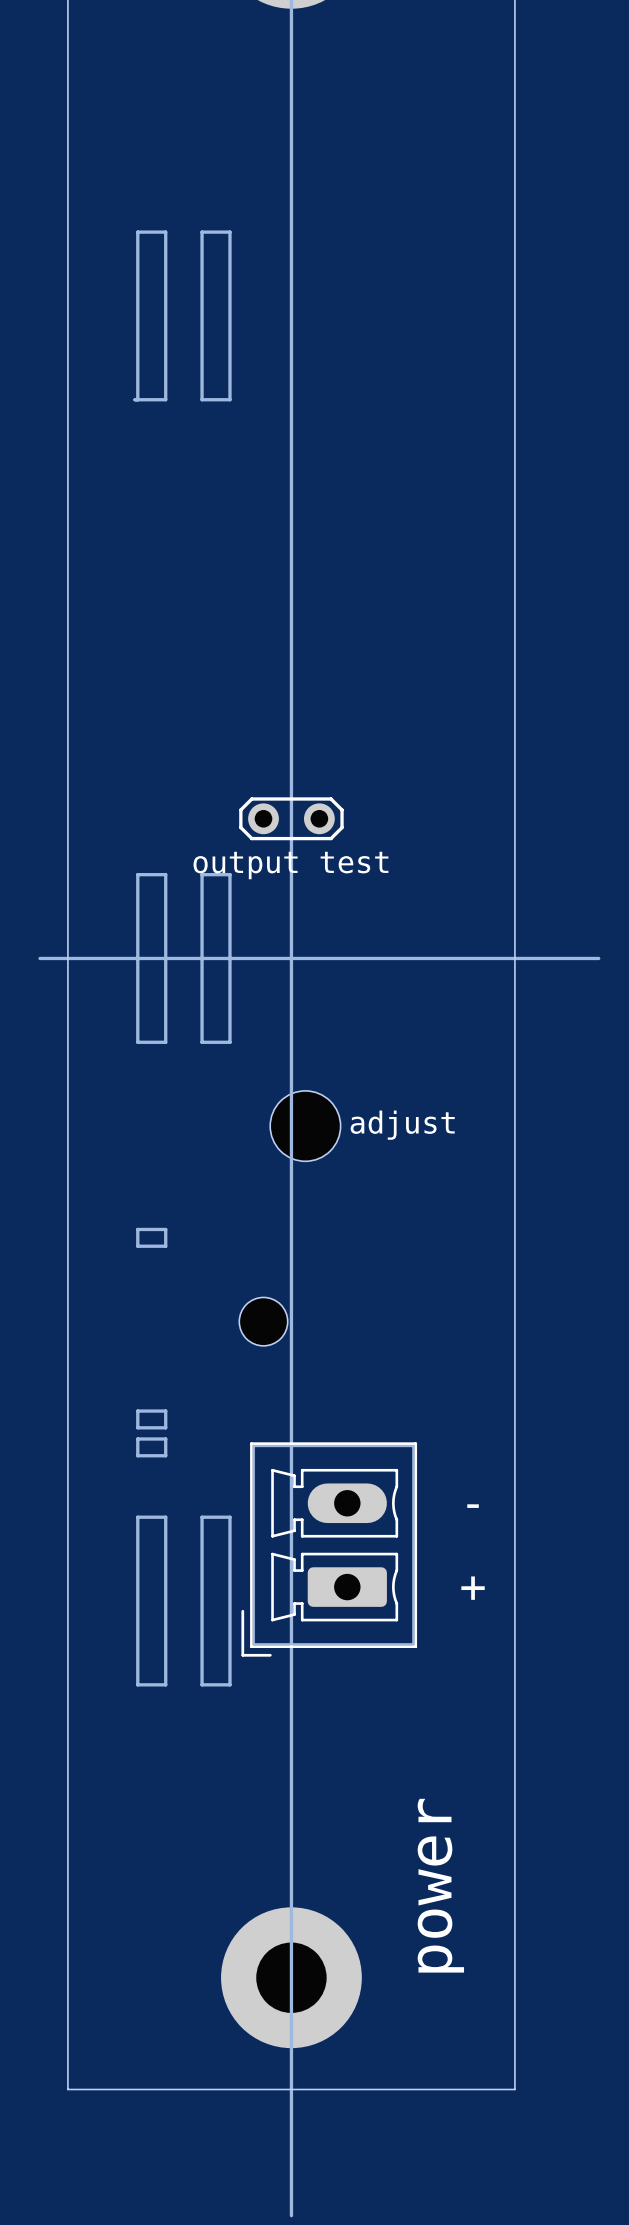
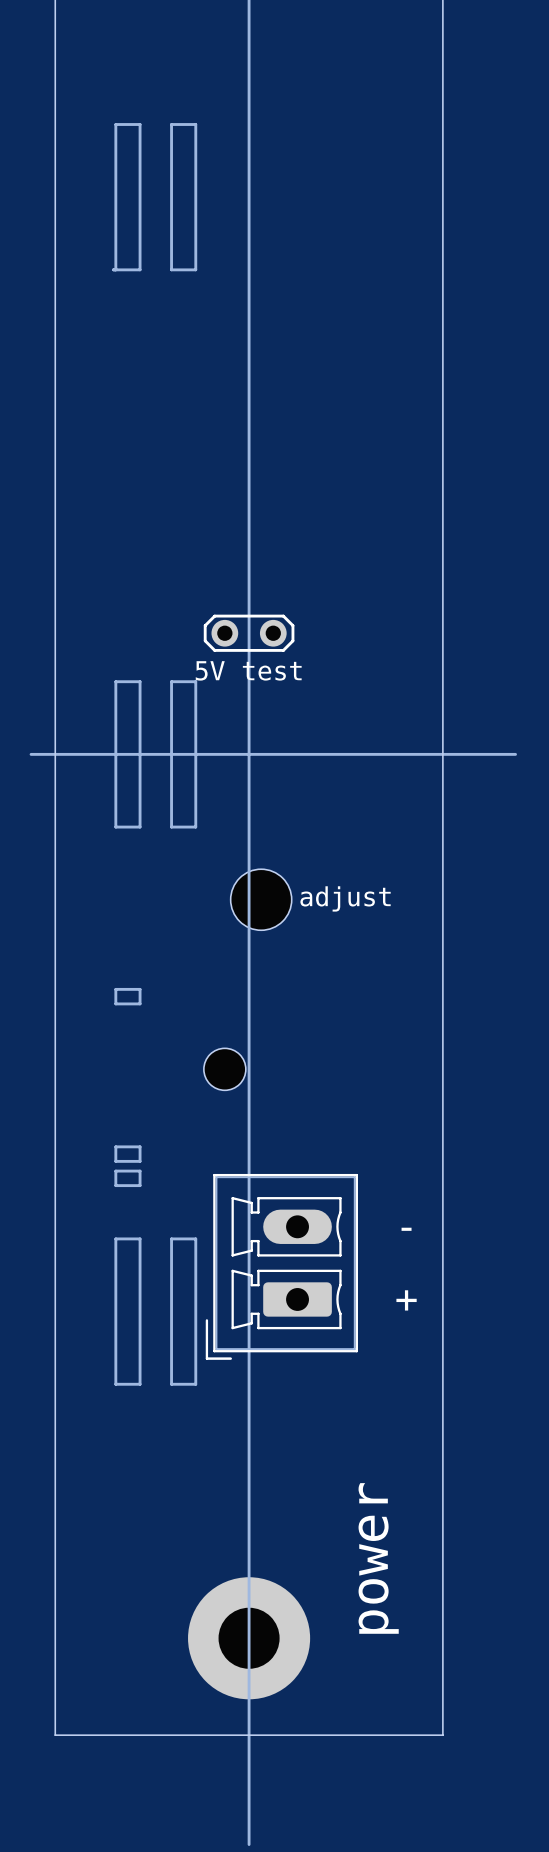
part value: output test (290, 865) -> 5V test (248, 670)

